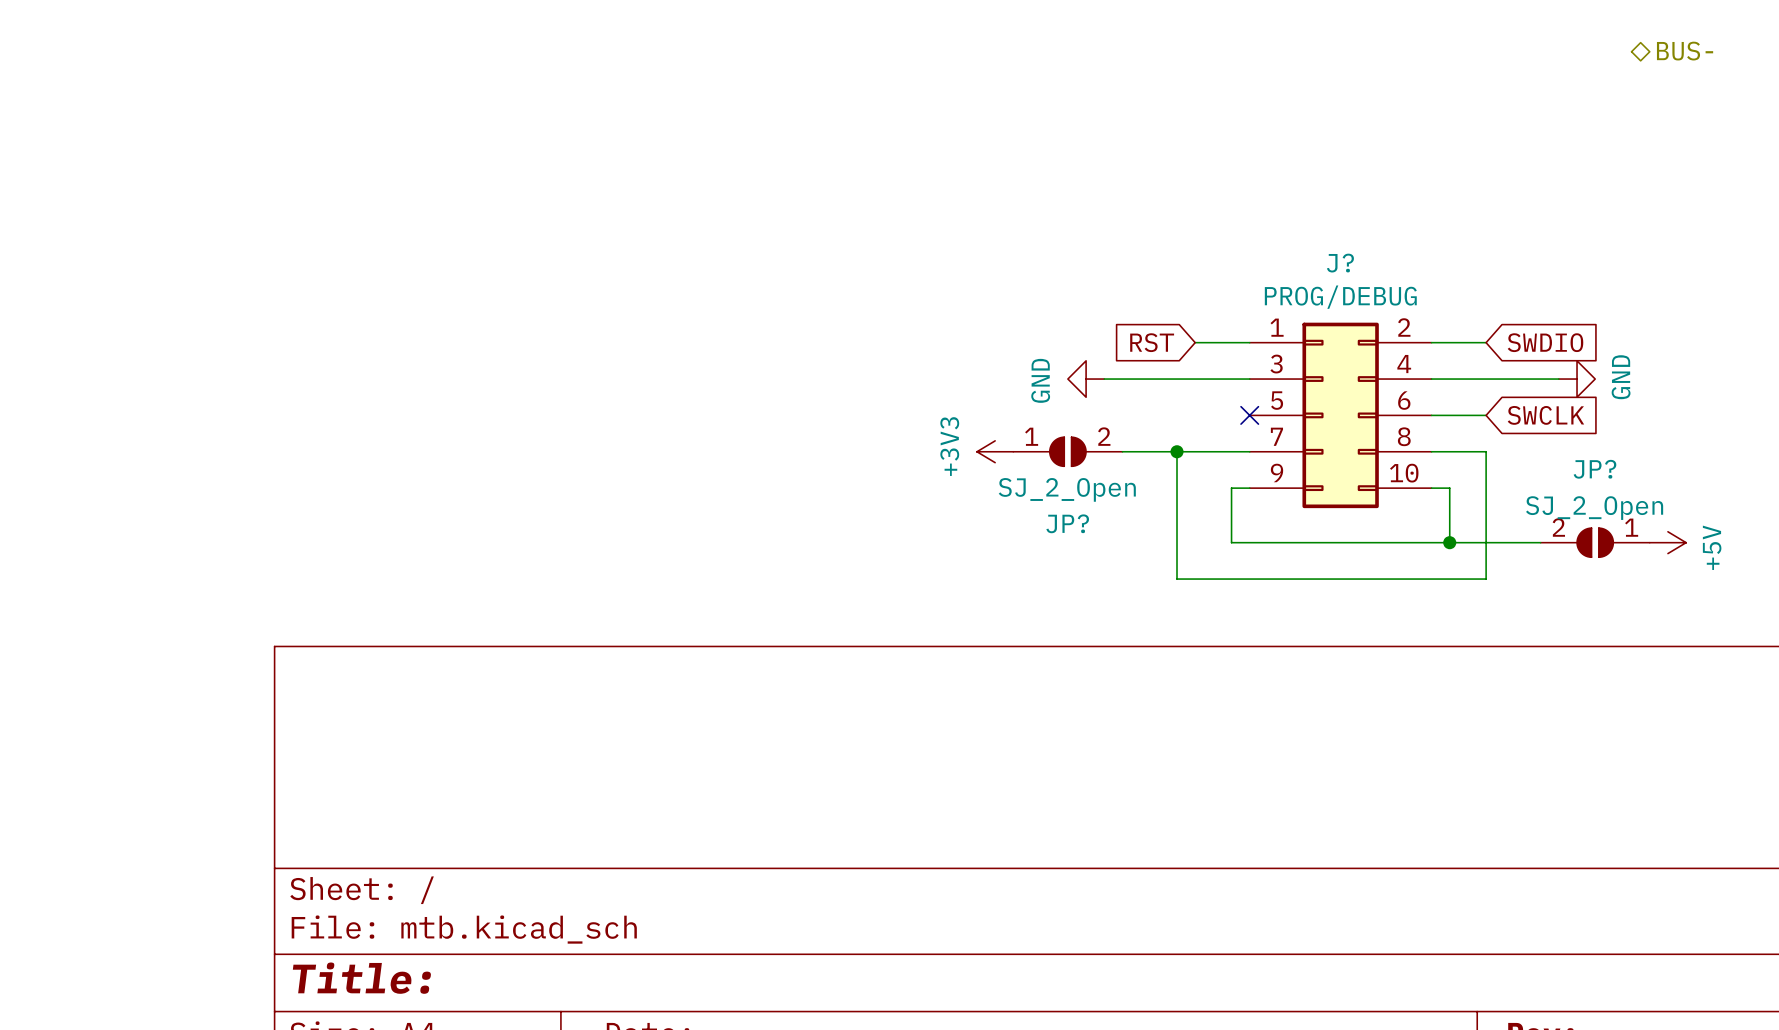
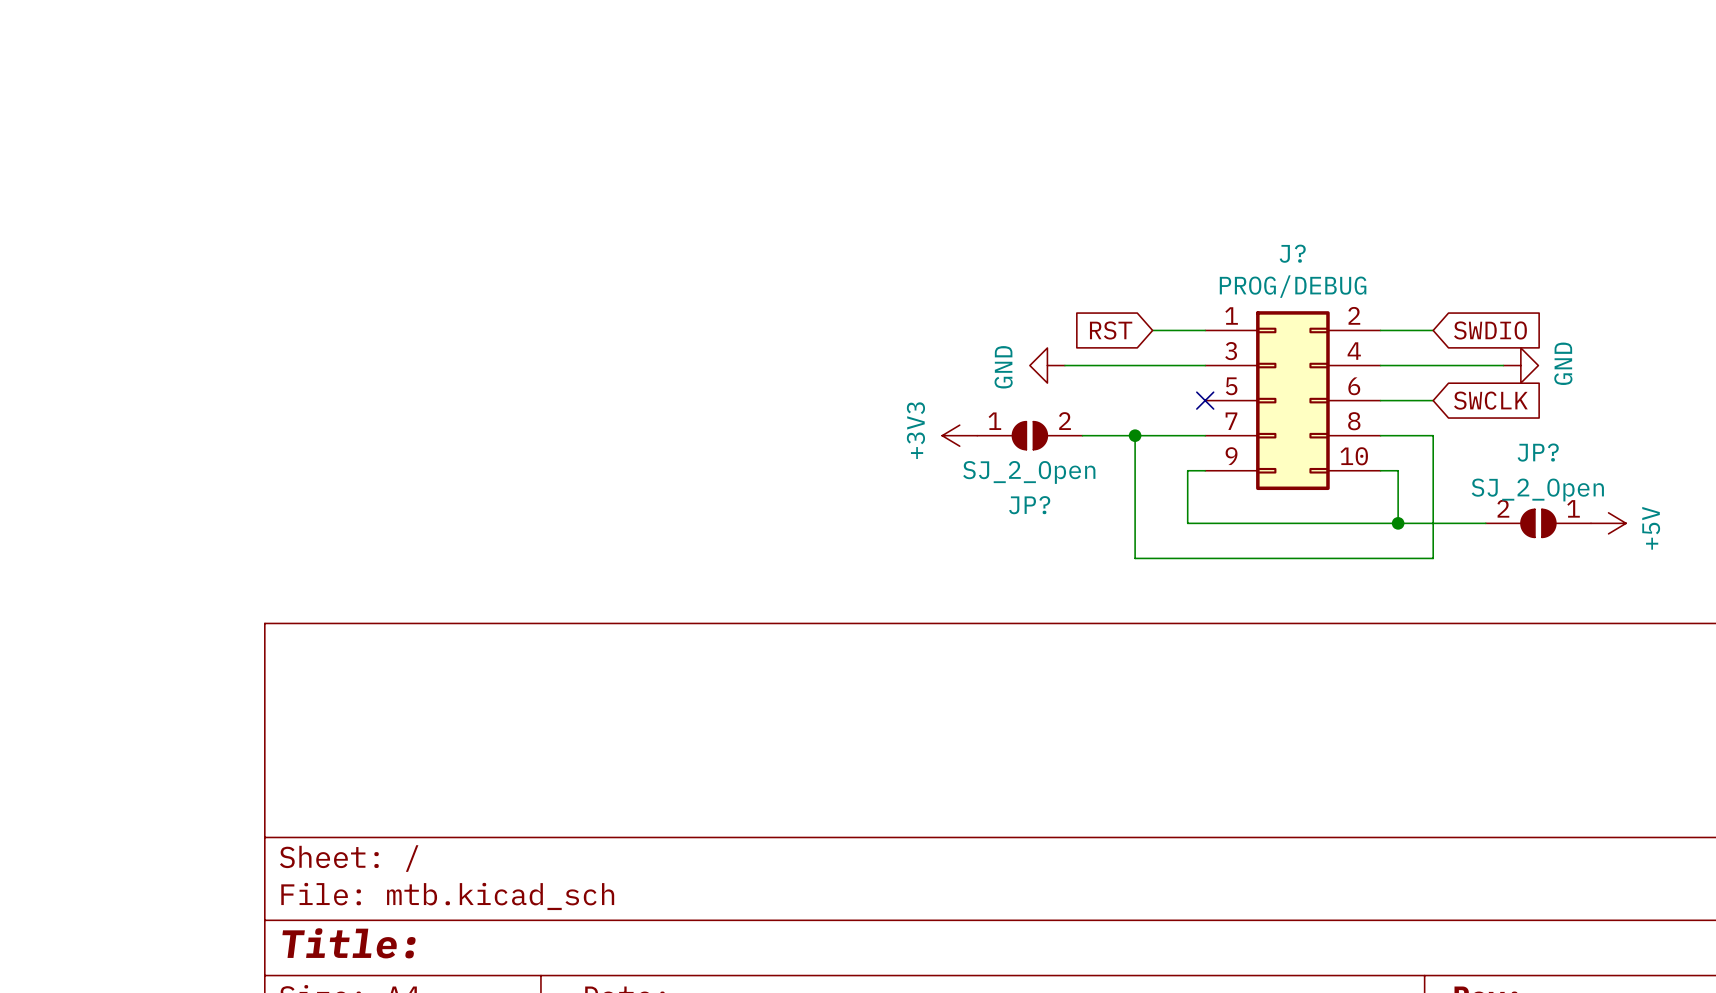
hierarchical label: BUS- (1685, 51) -> none

